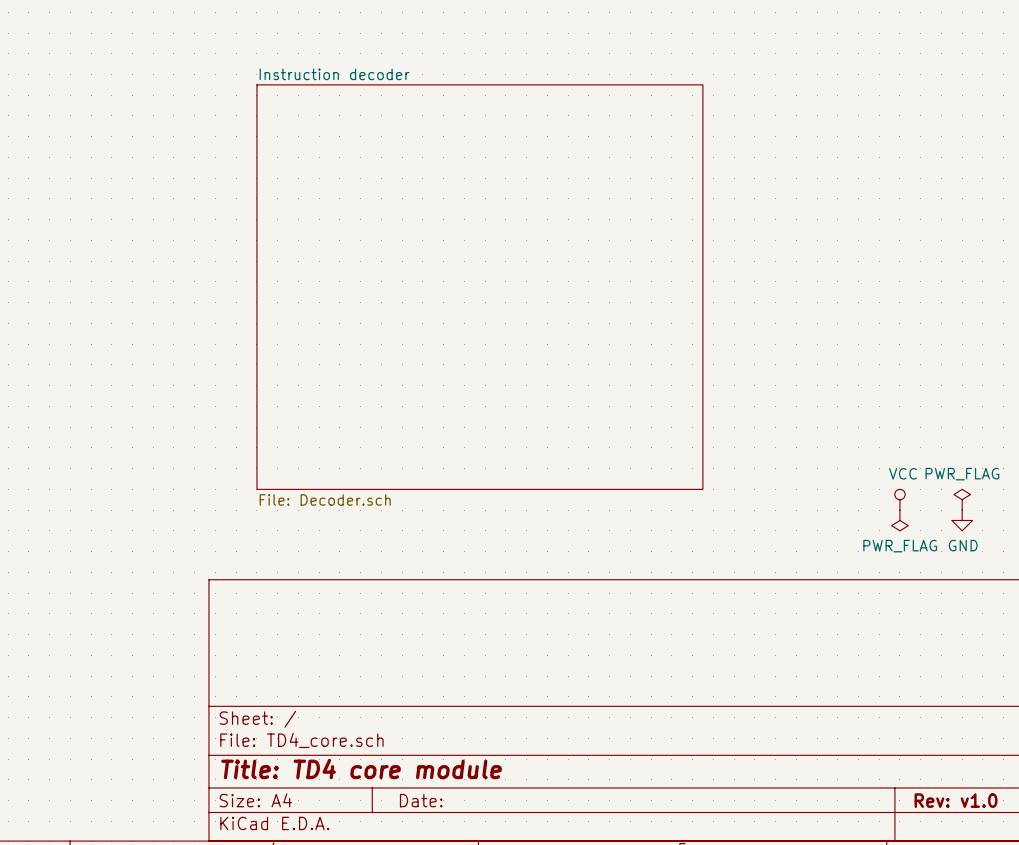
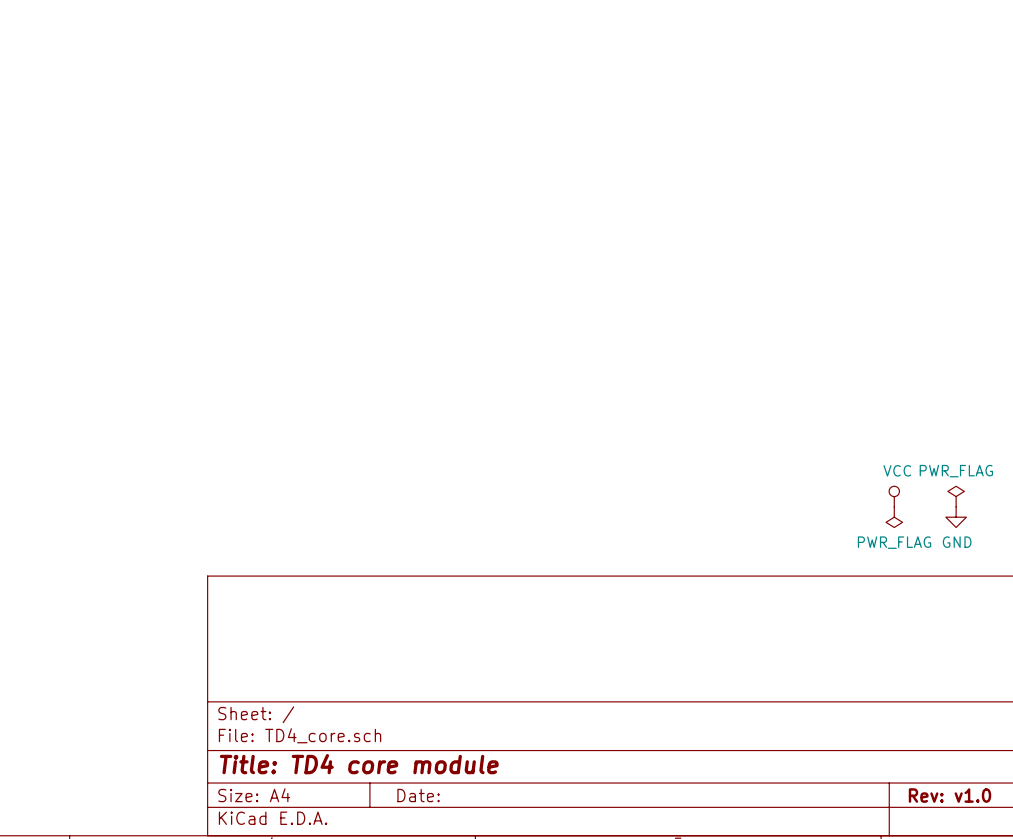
sheet Instruction decoder: File: Decoder.sch (479, 287) -> none

